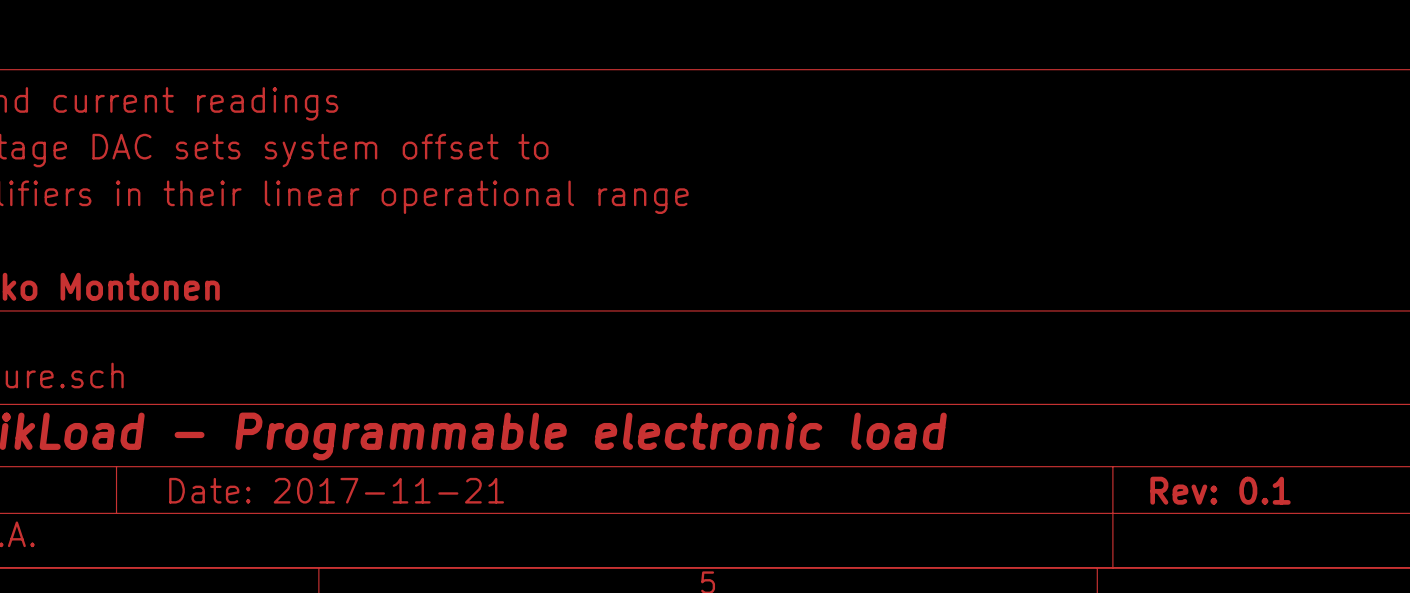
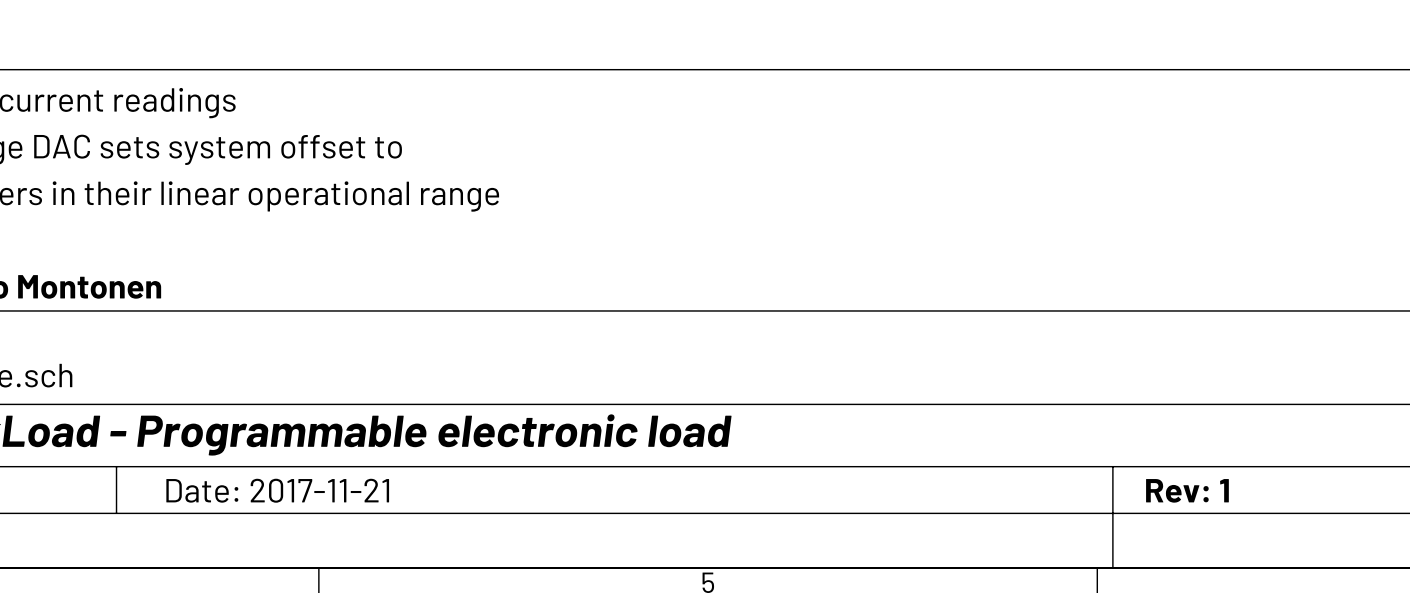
title block: Rev: 0.1 (1220, 490) -> Rev: 1 (1187, 490)

